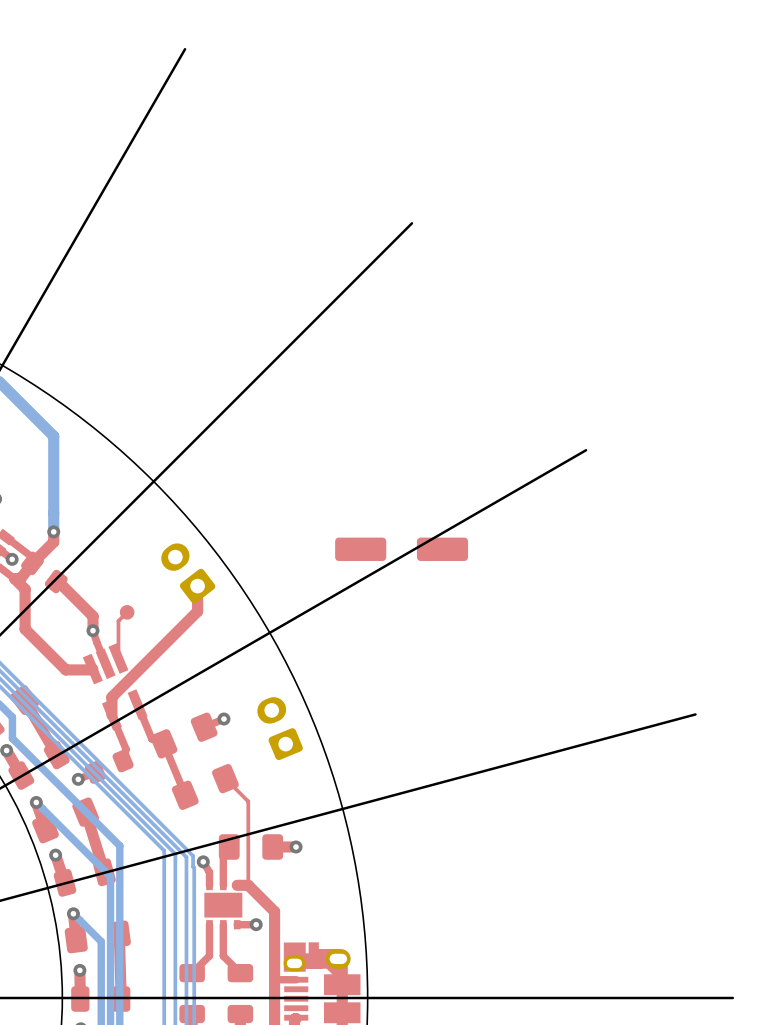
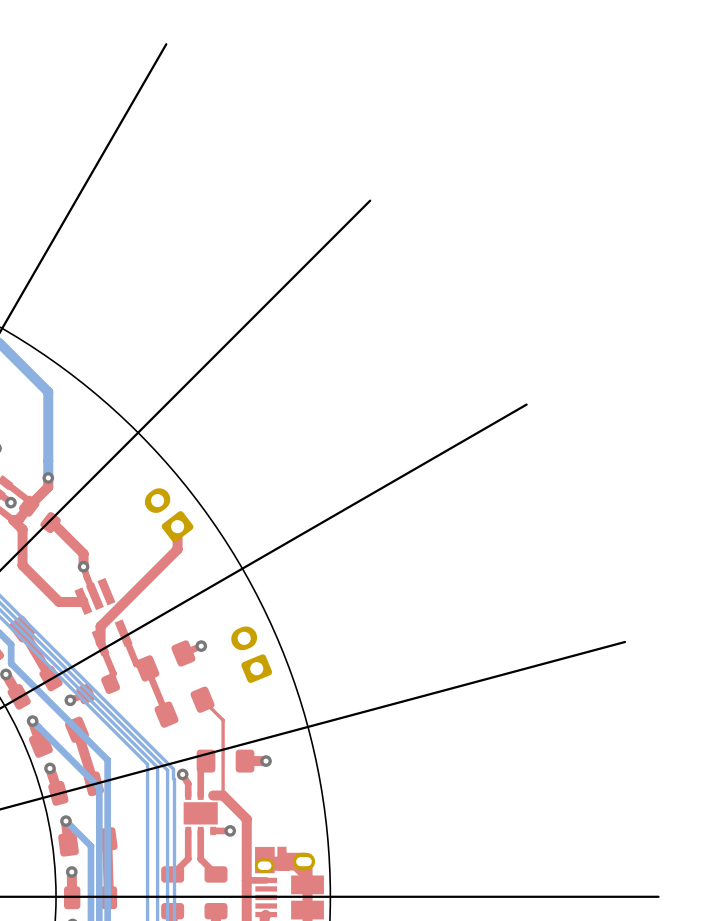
part: (401, 549) -> none
top track: (127, 612) (118, 621) (118, 658) -> none
part: (127, 612) -> none

